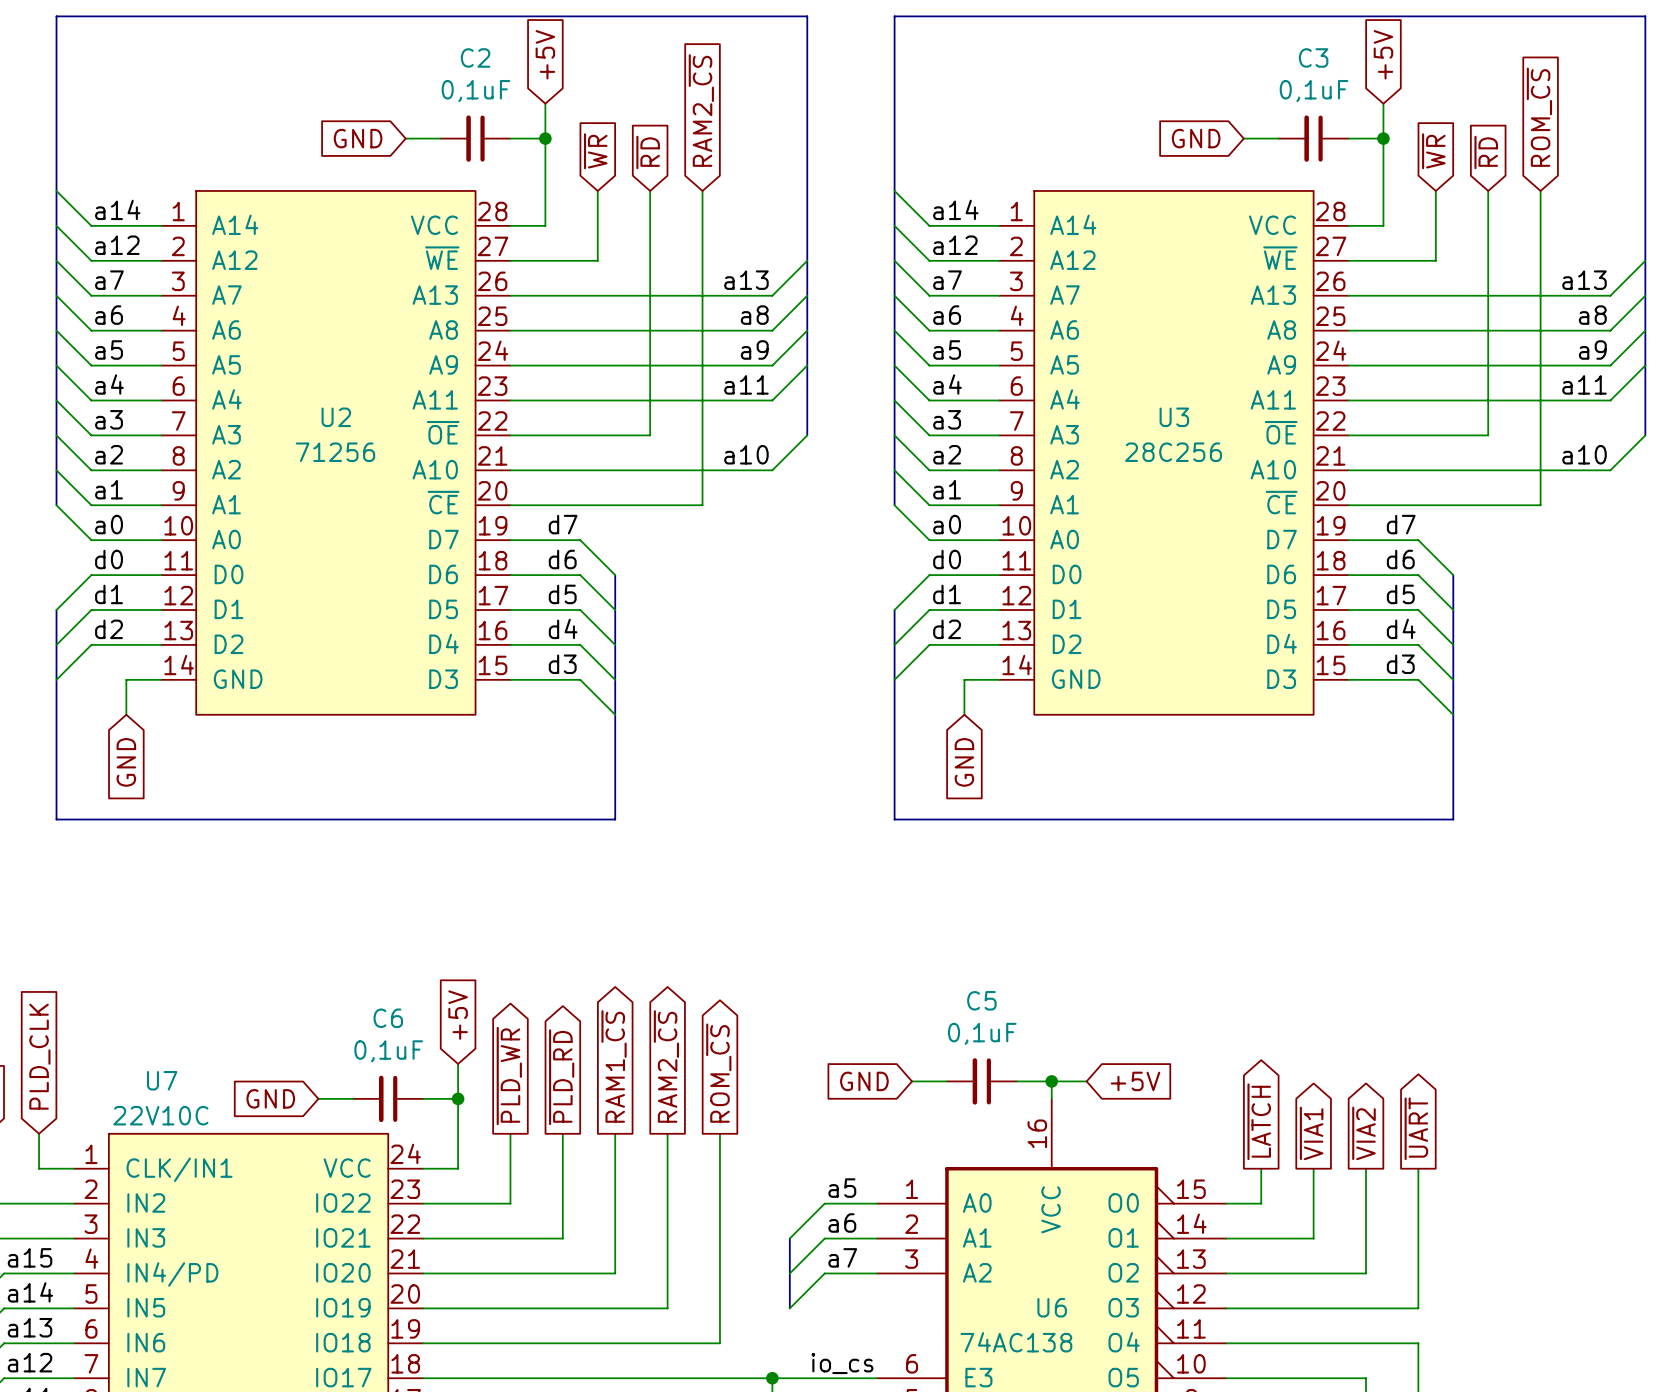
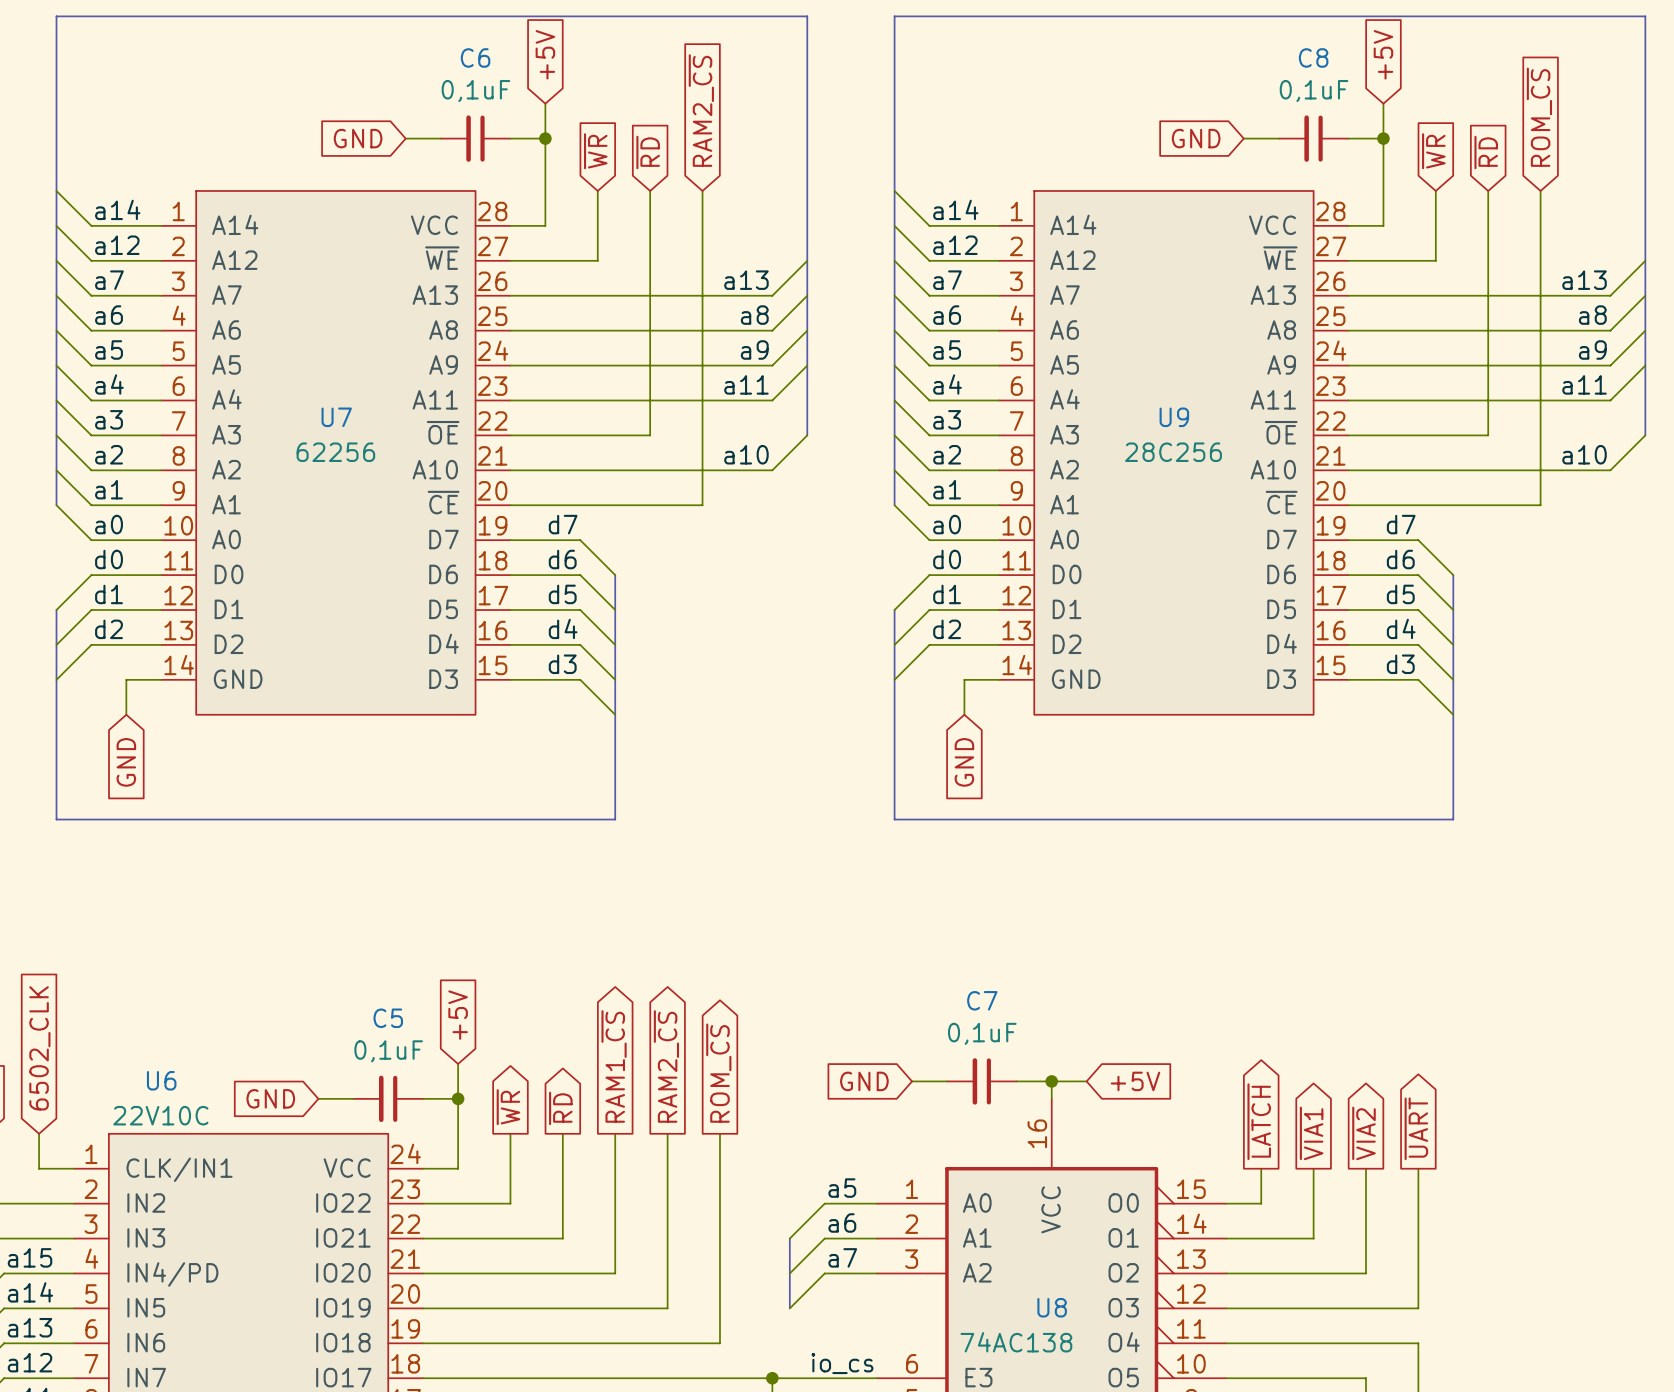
C2 name: C2 (475, 57) -> C6 (475, 57)
C3 name: C3 (1313, 57) -> C8 (1313, 57)
U2 name: U2 (336, 417) -> U7 (336, 417)
U3 name: U3 (1174, 417) -> U9 (1174, 417)
U2 value: 71256 (335, 452) -> 62256 (335, 452)
C5 name: C5 (981, 1000) -> C7 (982, 1000)
C6 name: C6 (388, 1018) -> C5 (388, 1018)
global label: PLD_CLK (39, 1056) -> 6502_CLK (39, 1048)
global label: ~{PLD_WR} (509, 1075) -> ~{WR} (508, 1107)
global label: ~{PLD_RD} (561, 1077) -> ~{RD} (560, 1108)
U7 name: U7 (162, 1080) -> U6 (161, 1080)
U6 name: U6 (1052, 1307) -> U8 (1052, 1307)

